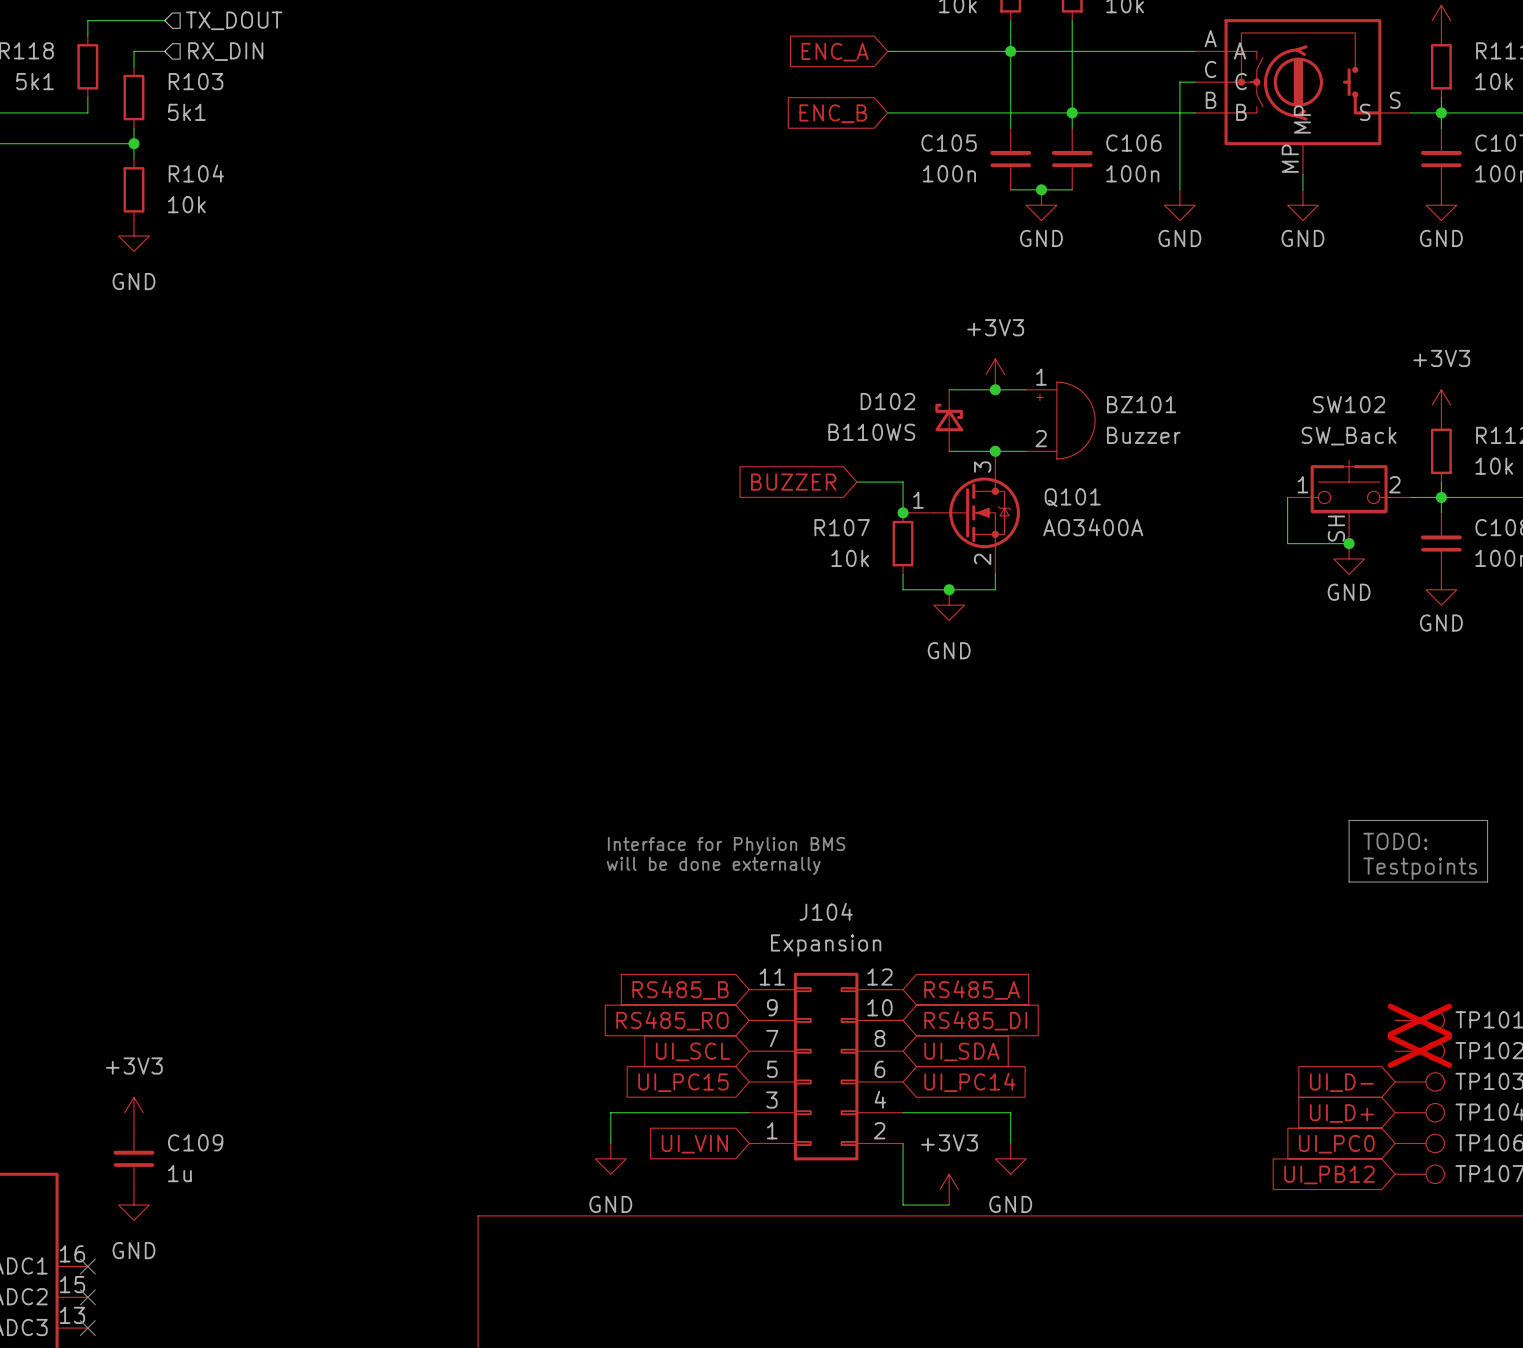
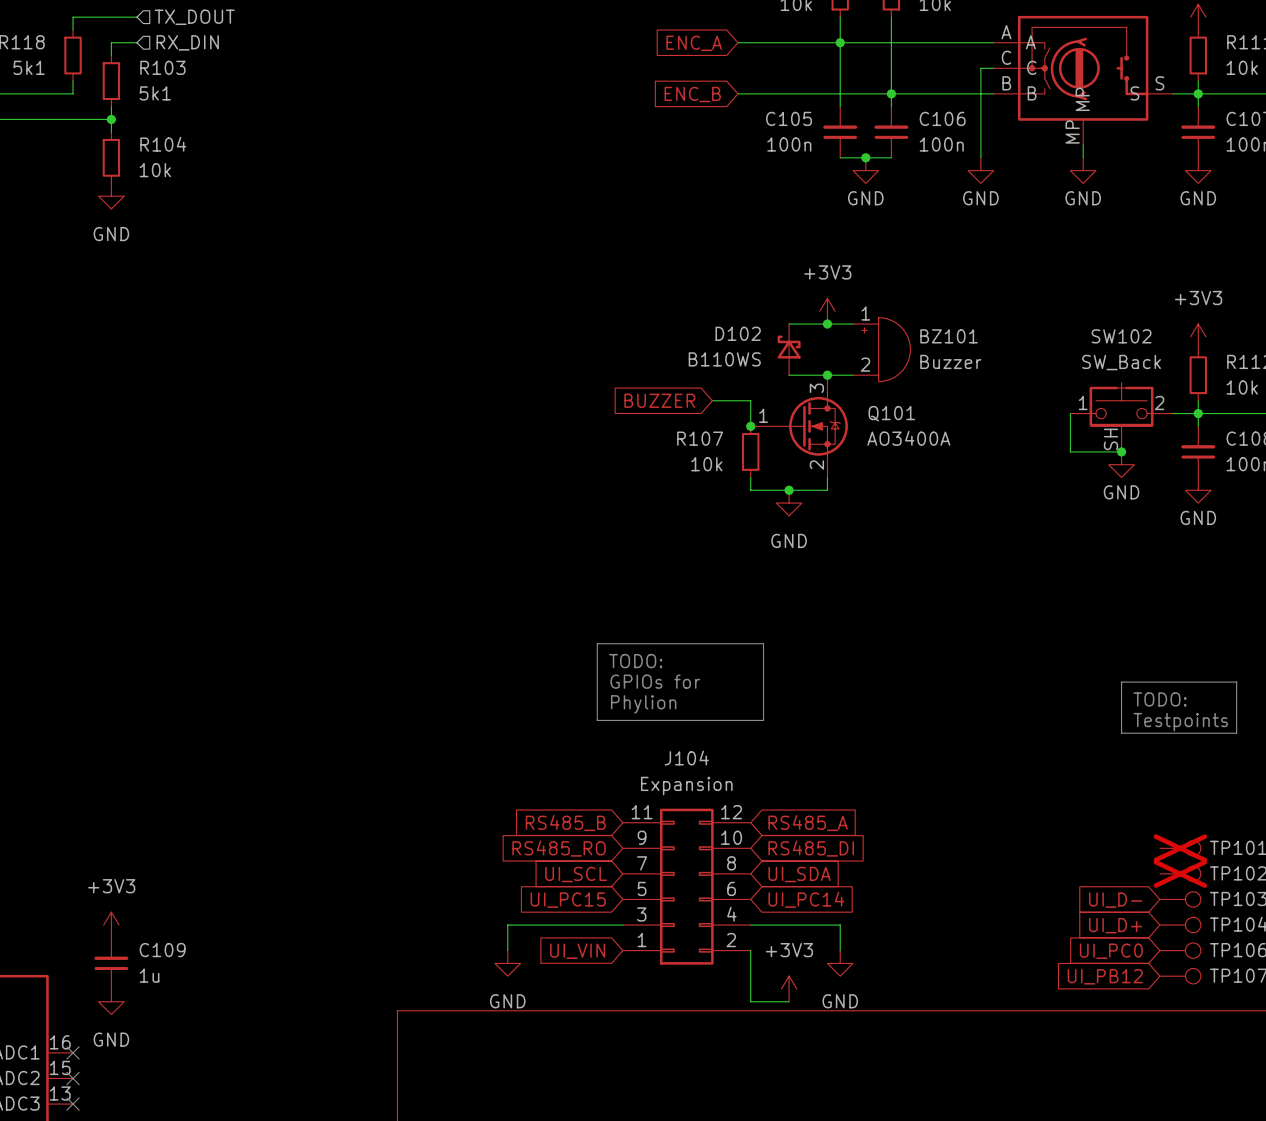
line: none -> (597, 643) (763, 643) (763, 720) (597, 720) (597, 643)
text: none -> TODO: (635, 661)
text: none -> GPIOs for (655, 681)
text: Interface for Phylion BMS (726, 846) -> none
text: none -> Phylion (643, 704)
text: will be done externally (713, 865) -> none

